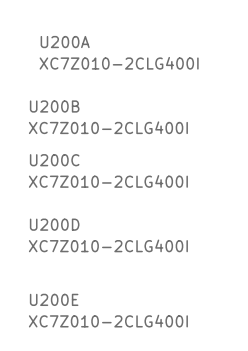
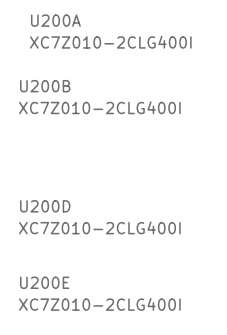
U200C: XC7Z010-2CLG400I (108, 170) -> none

